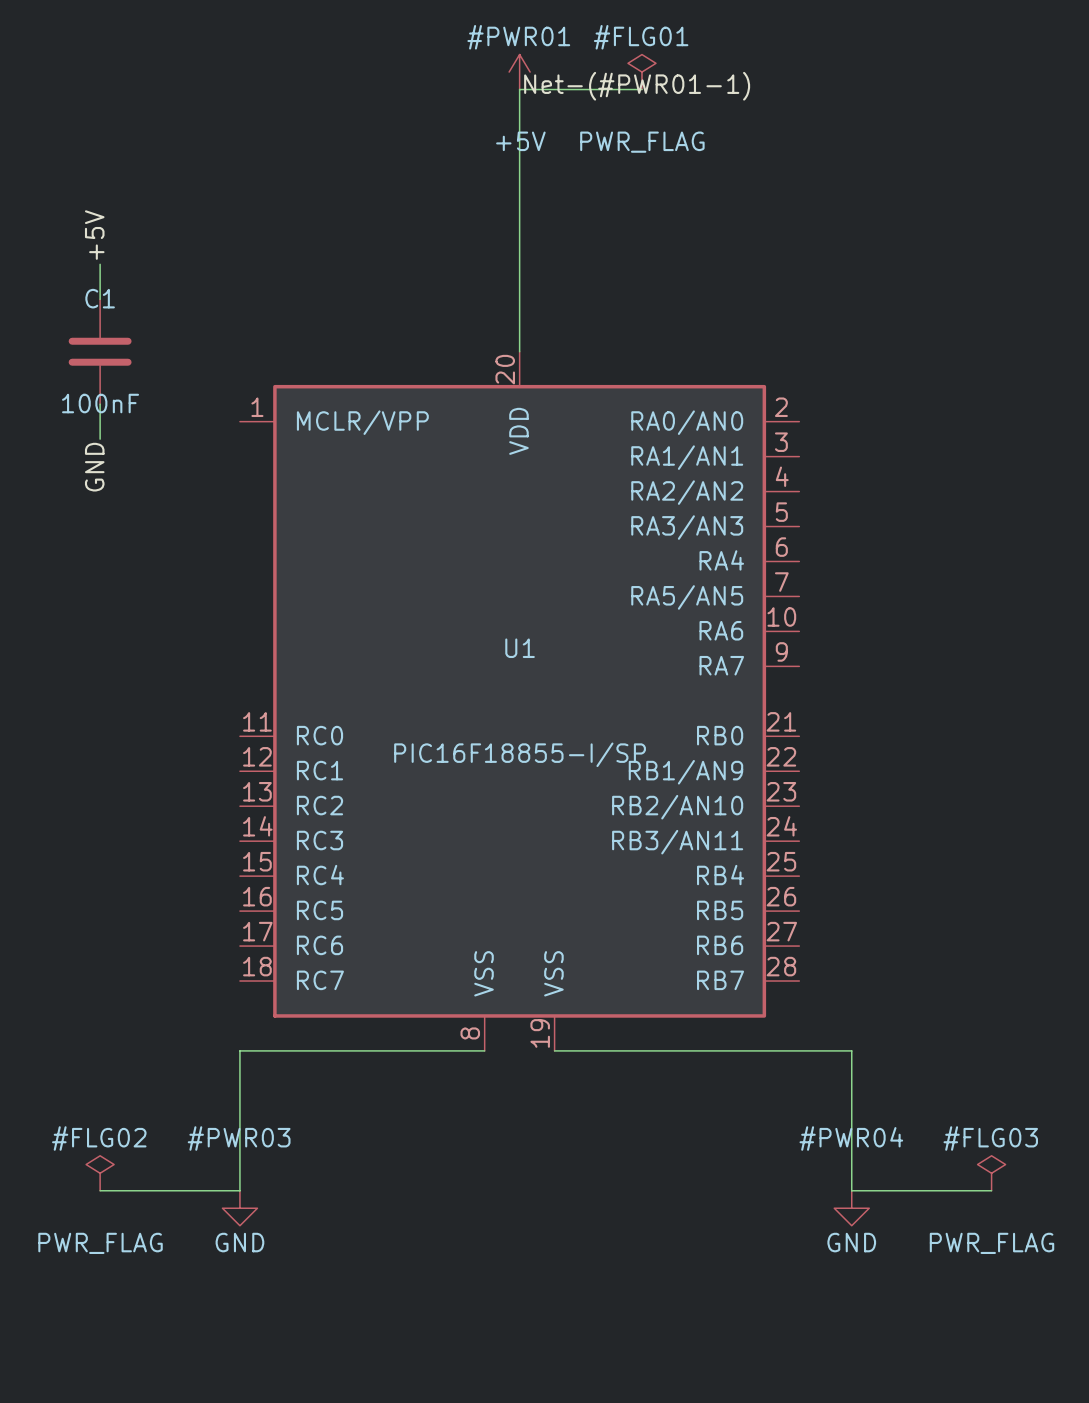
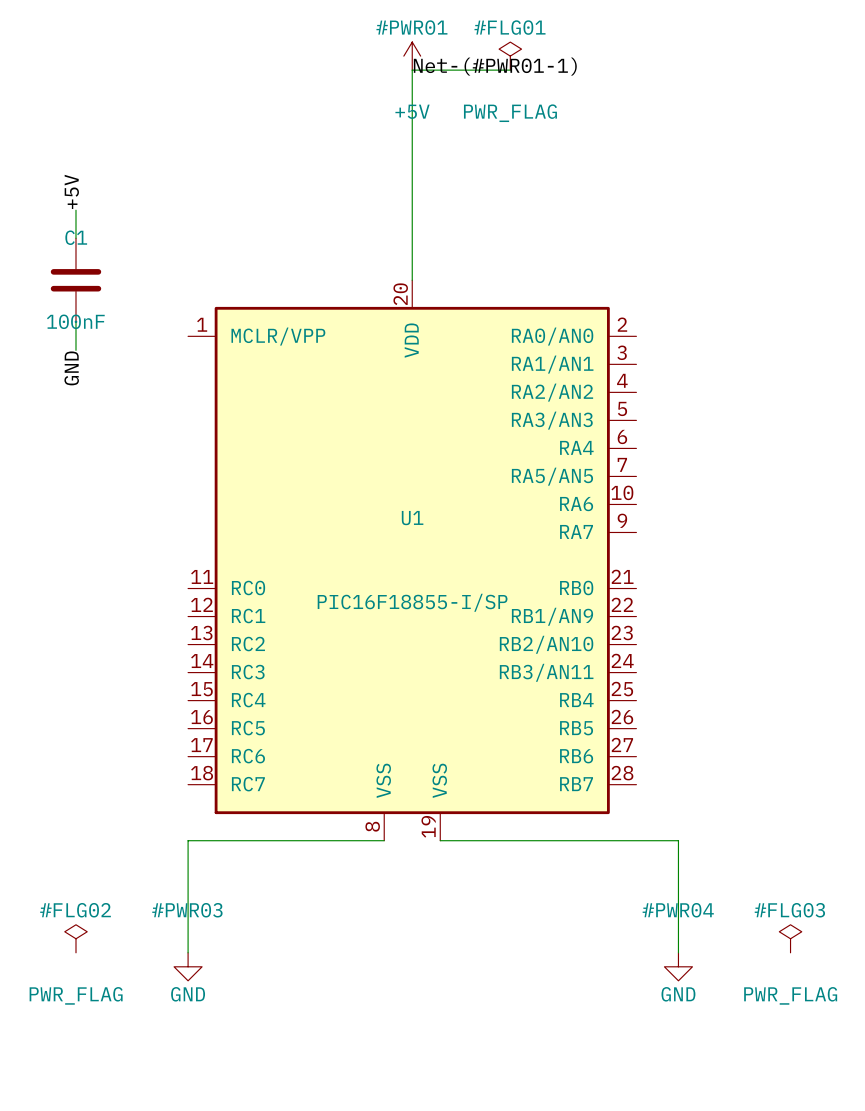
wire: (100, 1190) (239, 1190) -> none
wire: (851, 1190) (991, 1190) -> none

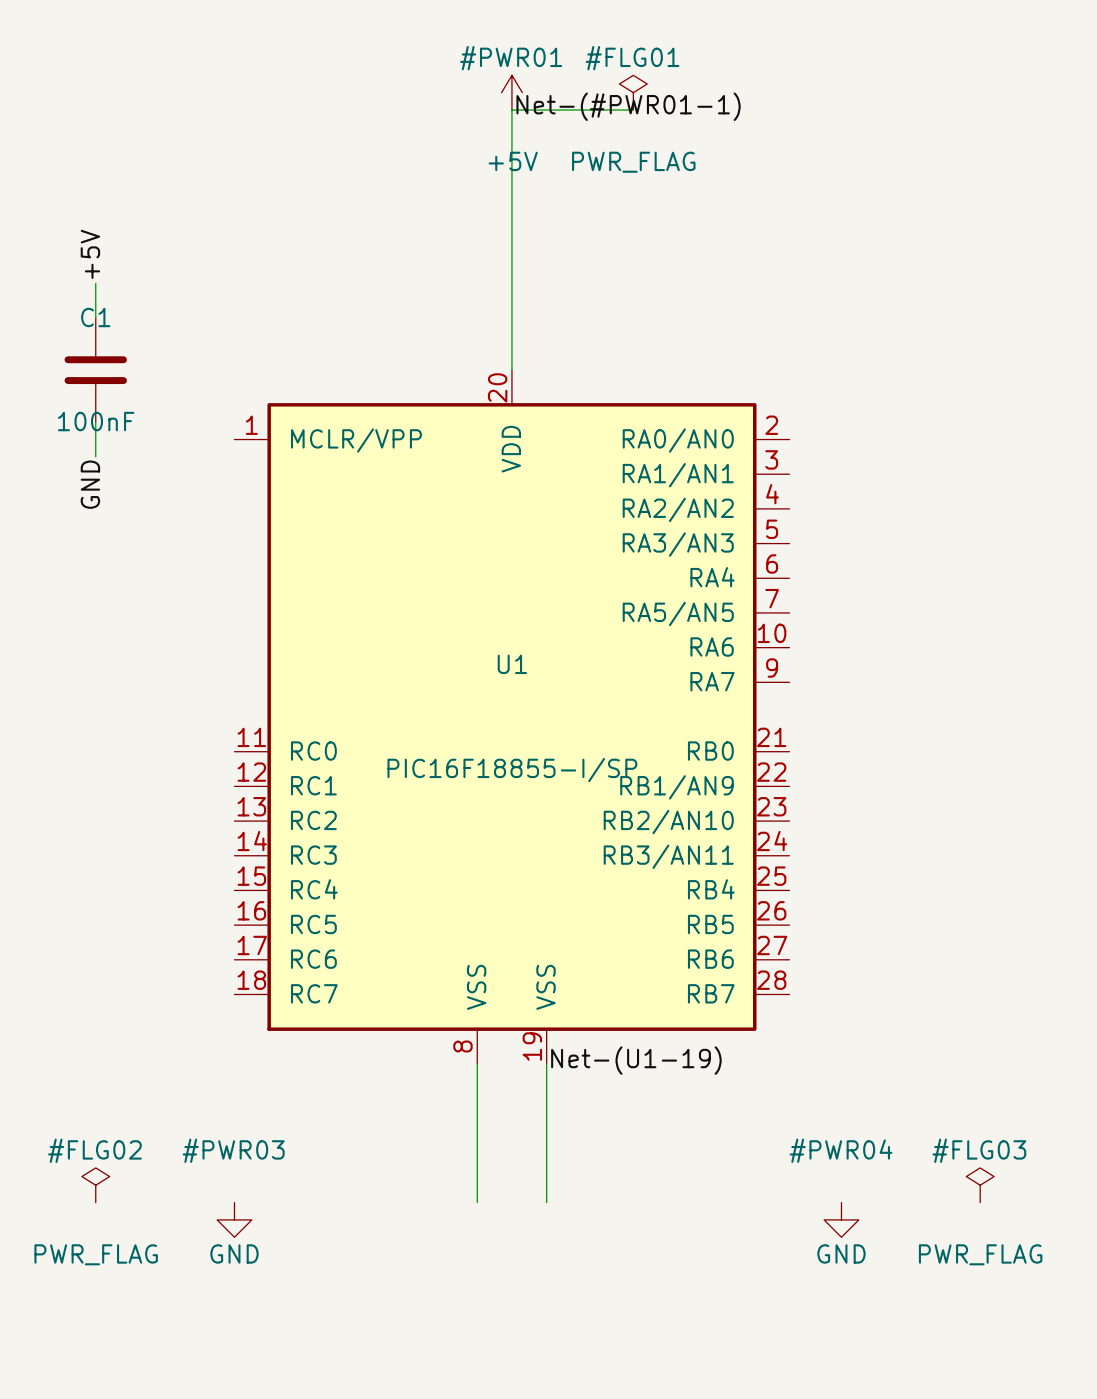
label: none -> Net-(U1-19) (636, 1060)
wire: (384, 840) (188, 840) (188, 952) -> (477, 1063) (477, 1202)
wire: (440, 840) (678, 840) (678, 952) -> (546, 1063) (546, 1202)

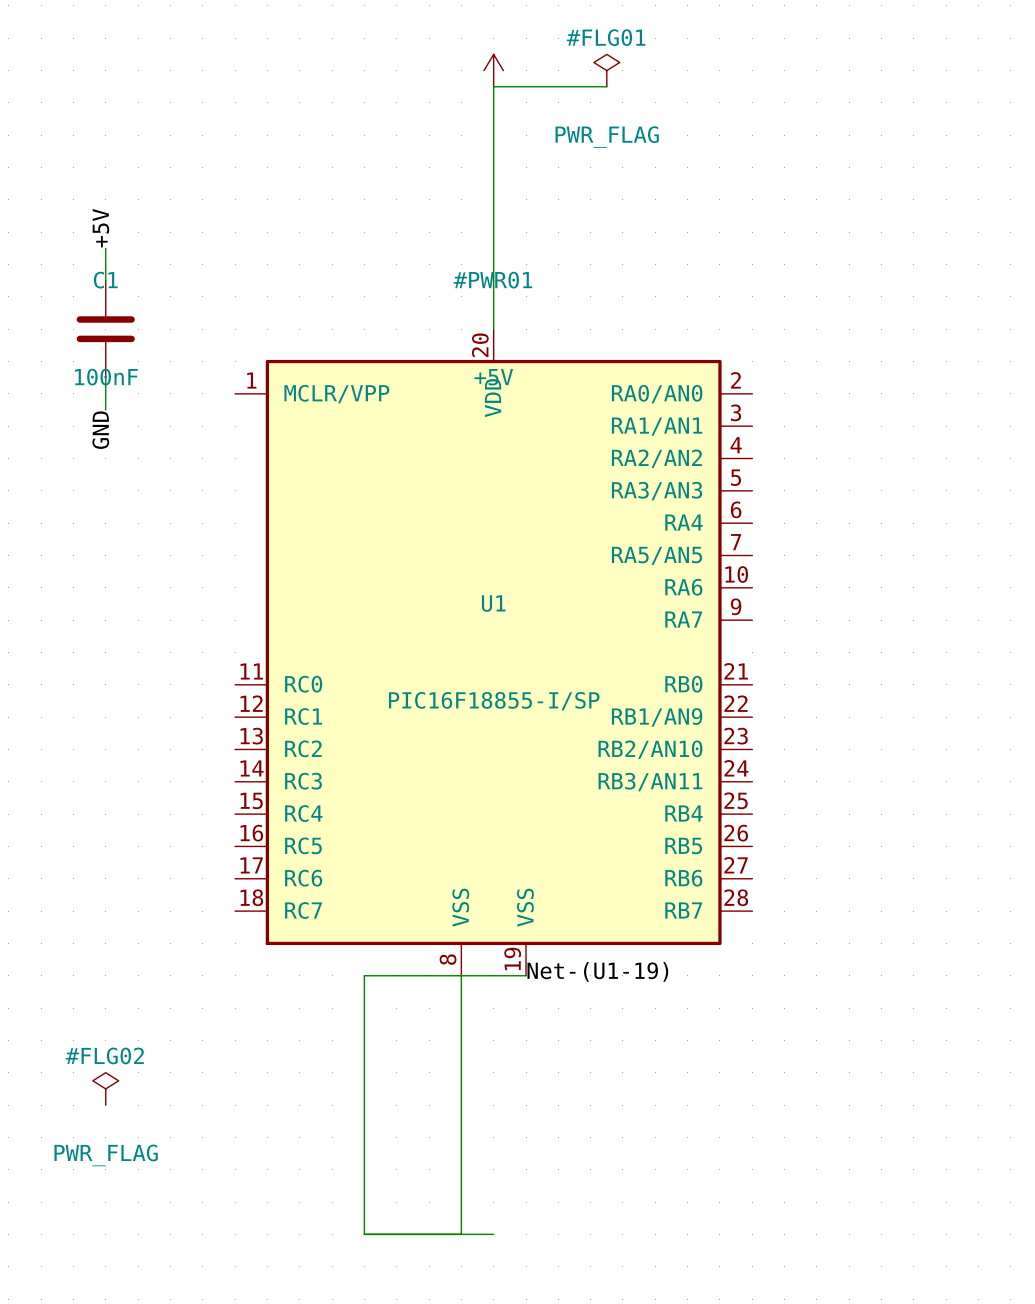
#PWR01 name position: #PWR01 (511, 58) -> #PWR01 (492, 280)
label: Net-(#PWR01-1) (628, 106) -> none
#PWR01 text position: +5V (513, 161) -> +5V (493, 377)
wire: (546, 1063) (546, 1202) -> (526, 975) (364, 975) (364, 1234) (493, 1234)
#FLG03: PWR_FLAG (980, 1185) -> none
wire: none -> (461, 1105) (461, 1234)
#PWR03: GND (234, 1219) -> none
#PWR04: GND (841, 1219) -> none

